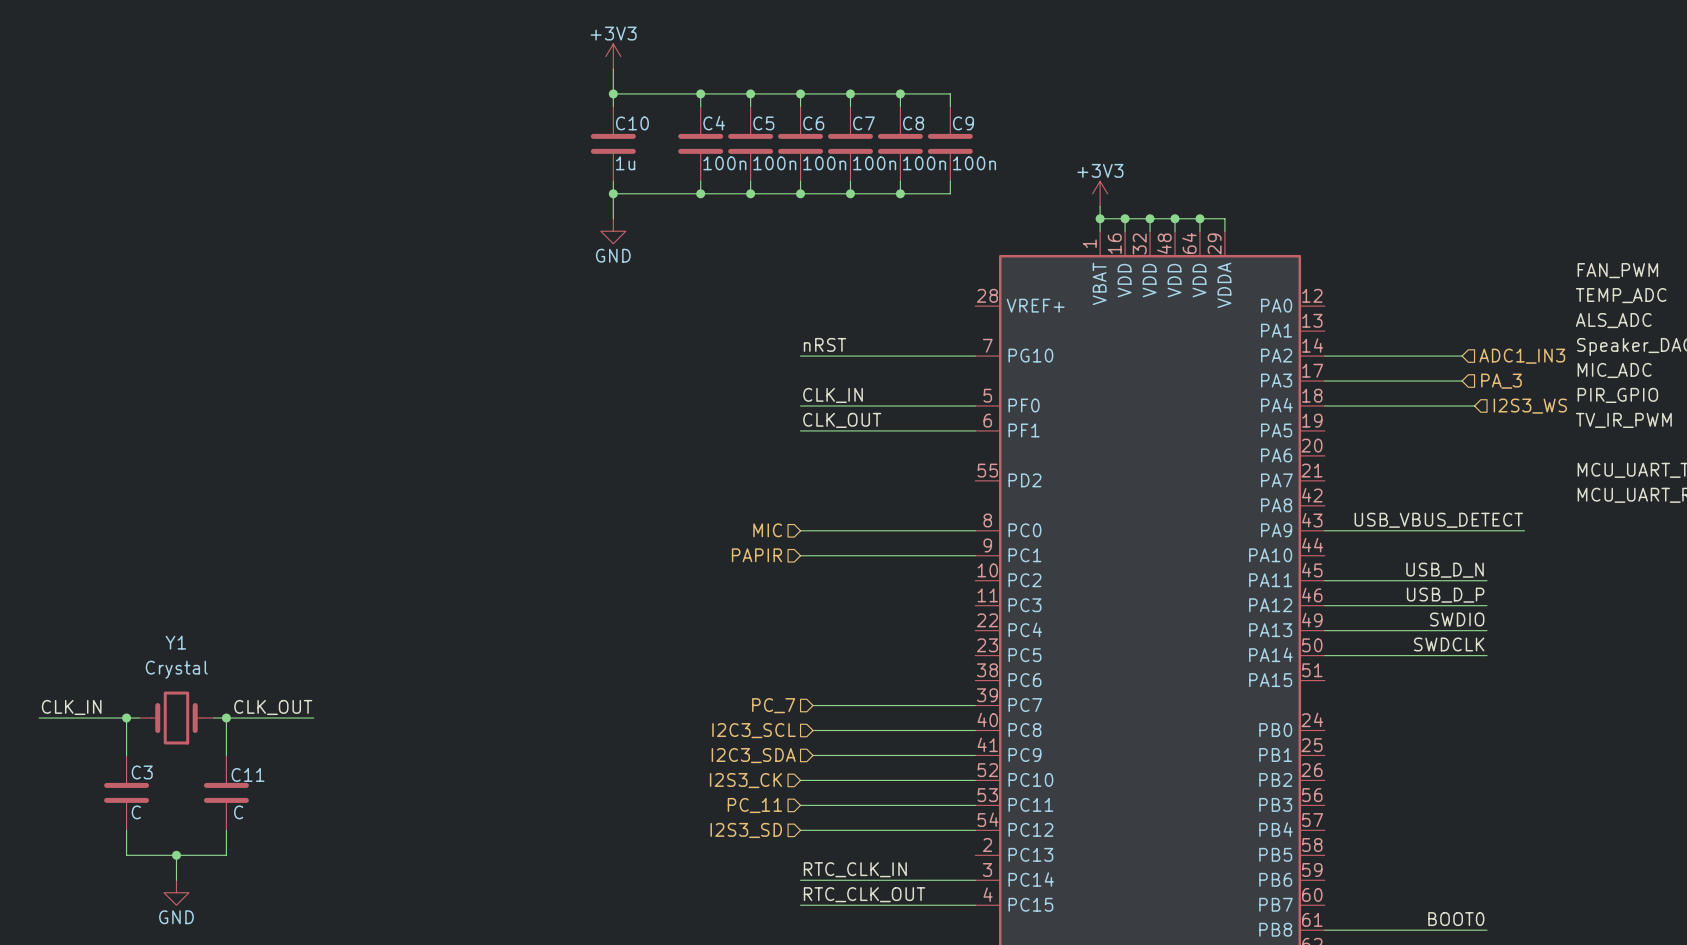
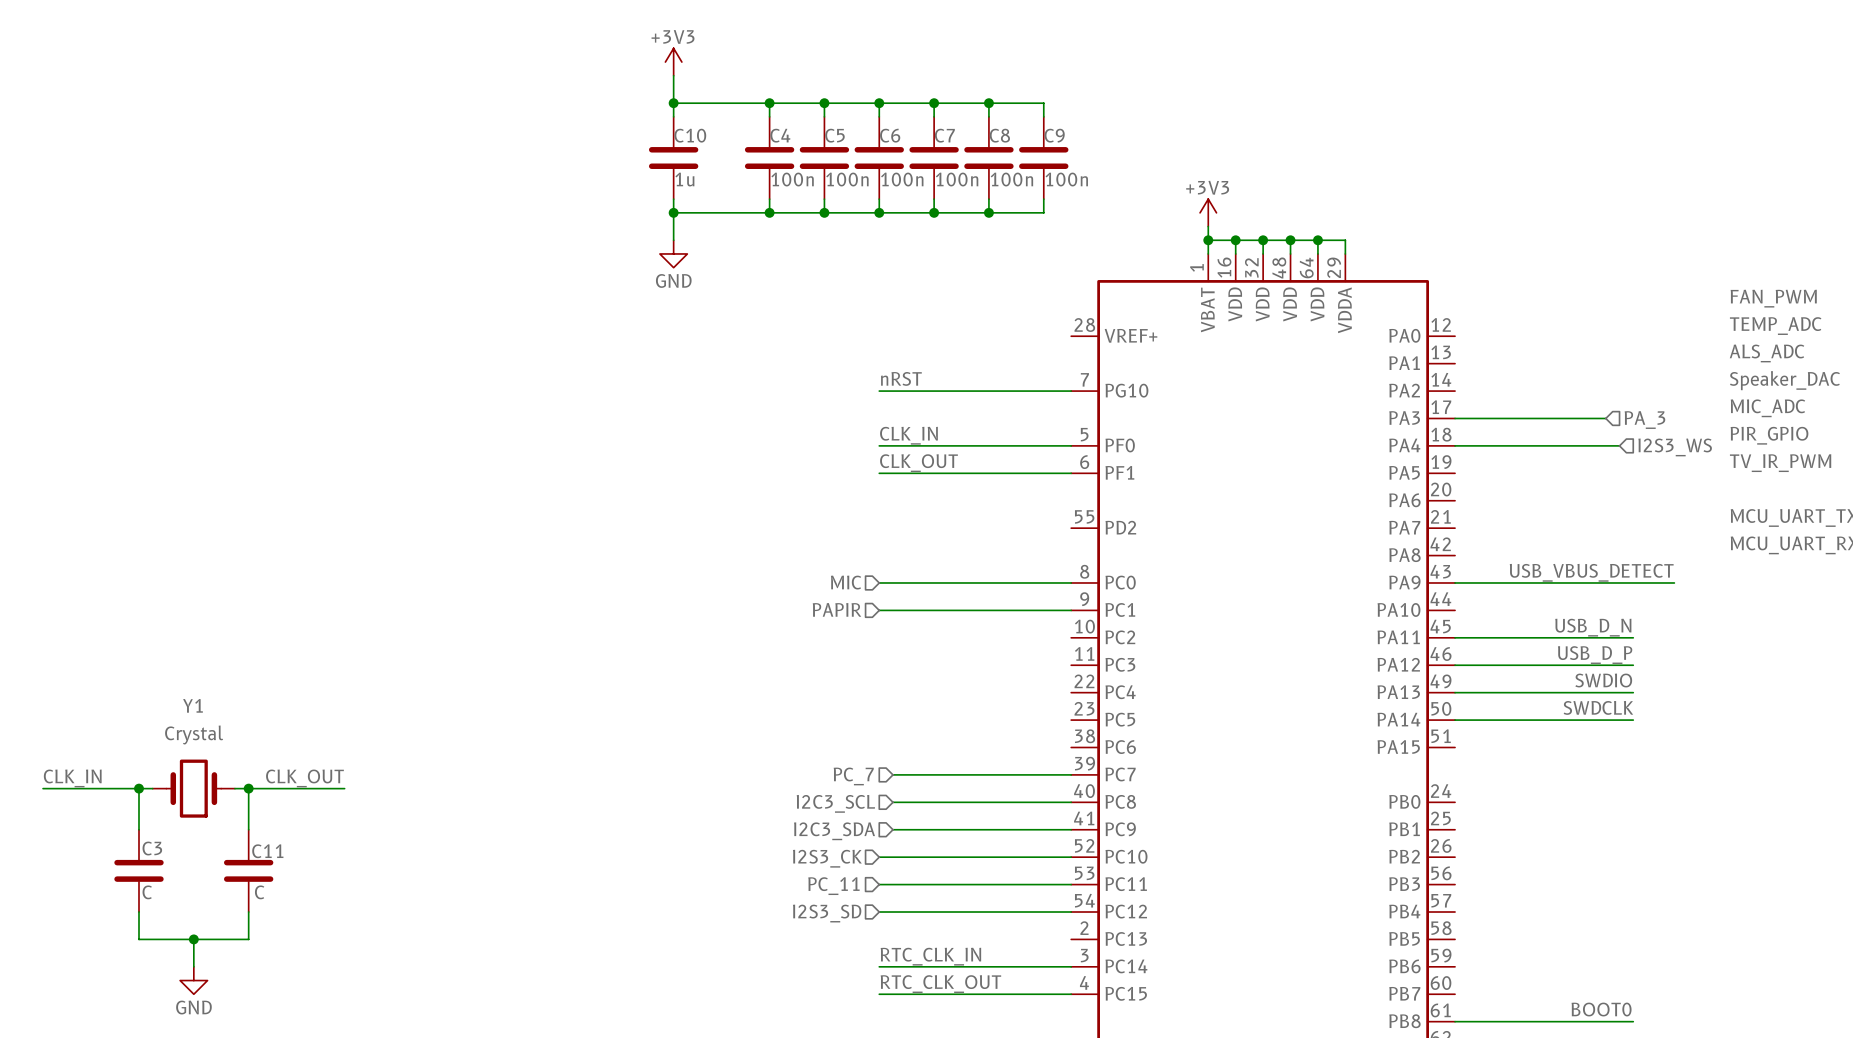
wire: (1324, 356) (1462, 356) -> none
hierarchical label: ADC1_IN3 (1522, 356) -> none

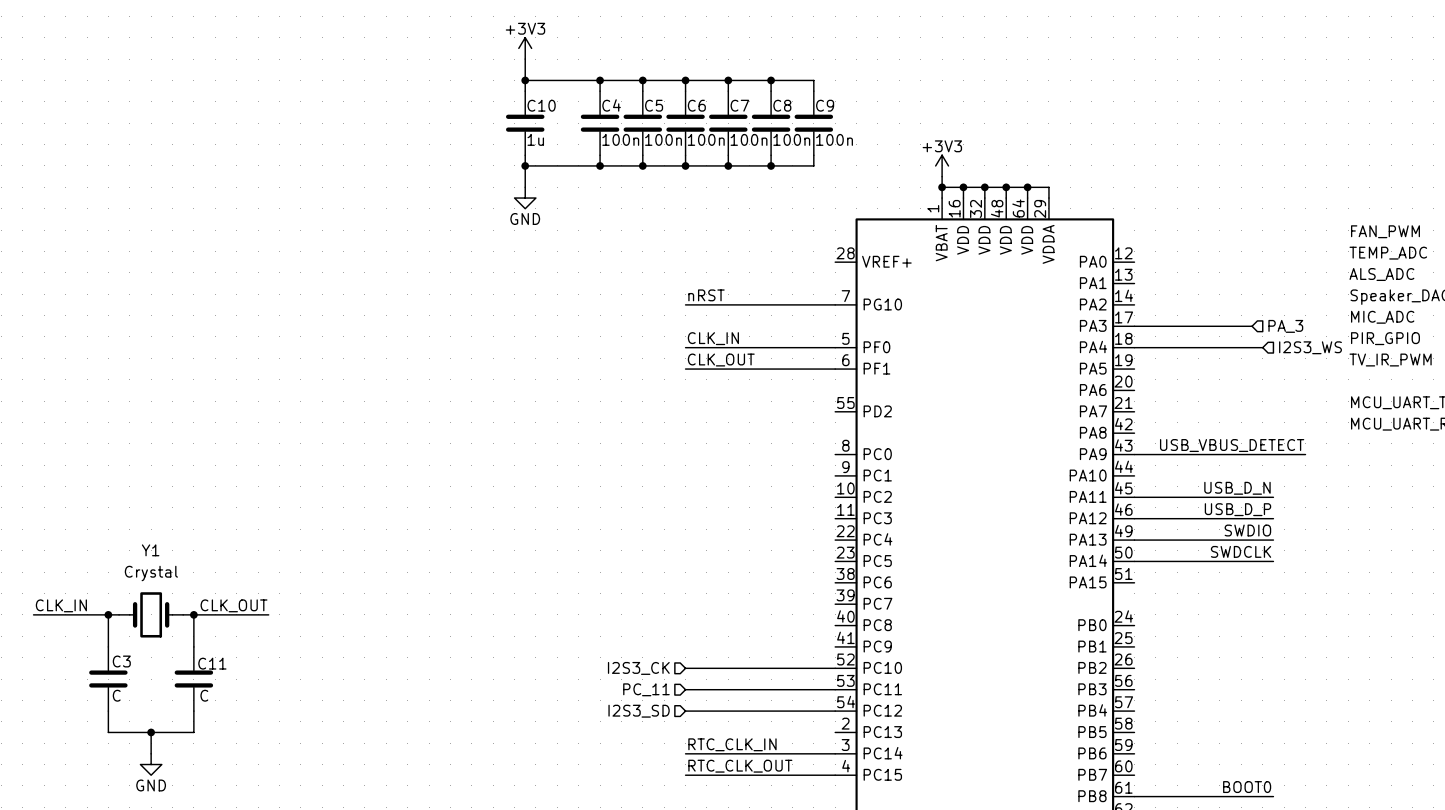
hierarchical label: MIC (846, 582) -> none
wire: (879, 582) (1071, 582) -> none
hierarchical label: PAPIR (837, 609) -> none
wire: (879, 610) (1071, 610) -> none
wire: (892, 774) (1071, 774) -> none
hierarchical label: PC_7 (853, 776) -> none
wire: (892, 802) (1071, 802) -> none
hierarchical label: I2C3_SCL (835, 803) -> none
wire: (892, 829) (1071, 829) -> none
hierarchical label: I2C3_SDA (834, 831) -> none

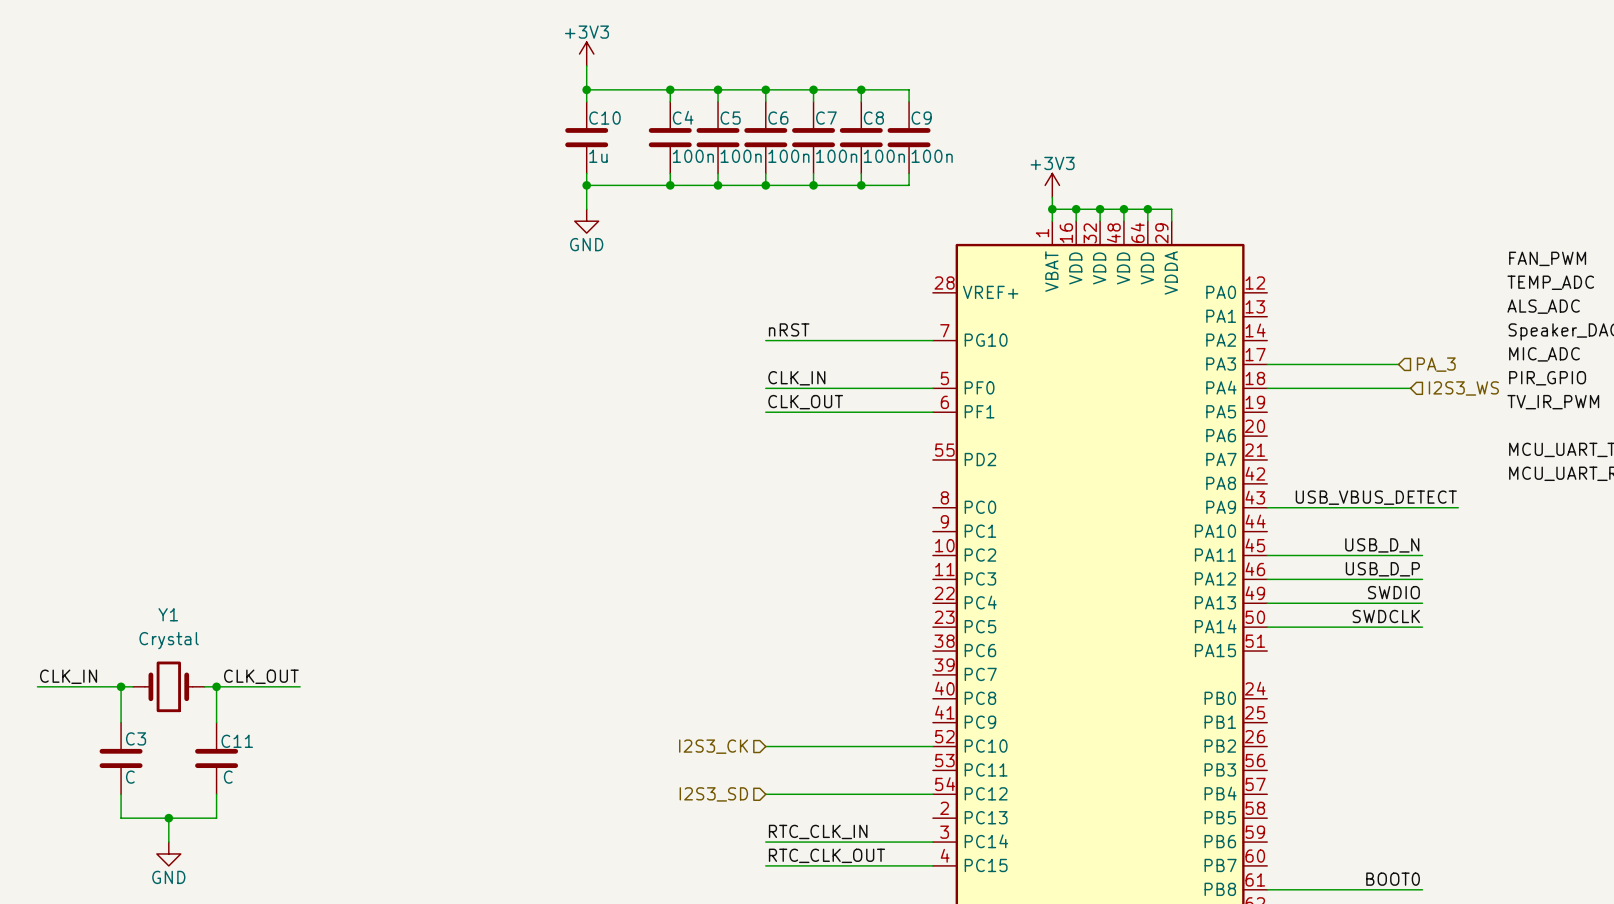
hierarchical label: PC_11 (646, 689) -> none
wire: (685, 689) (835, 689) -> none

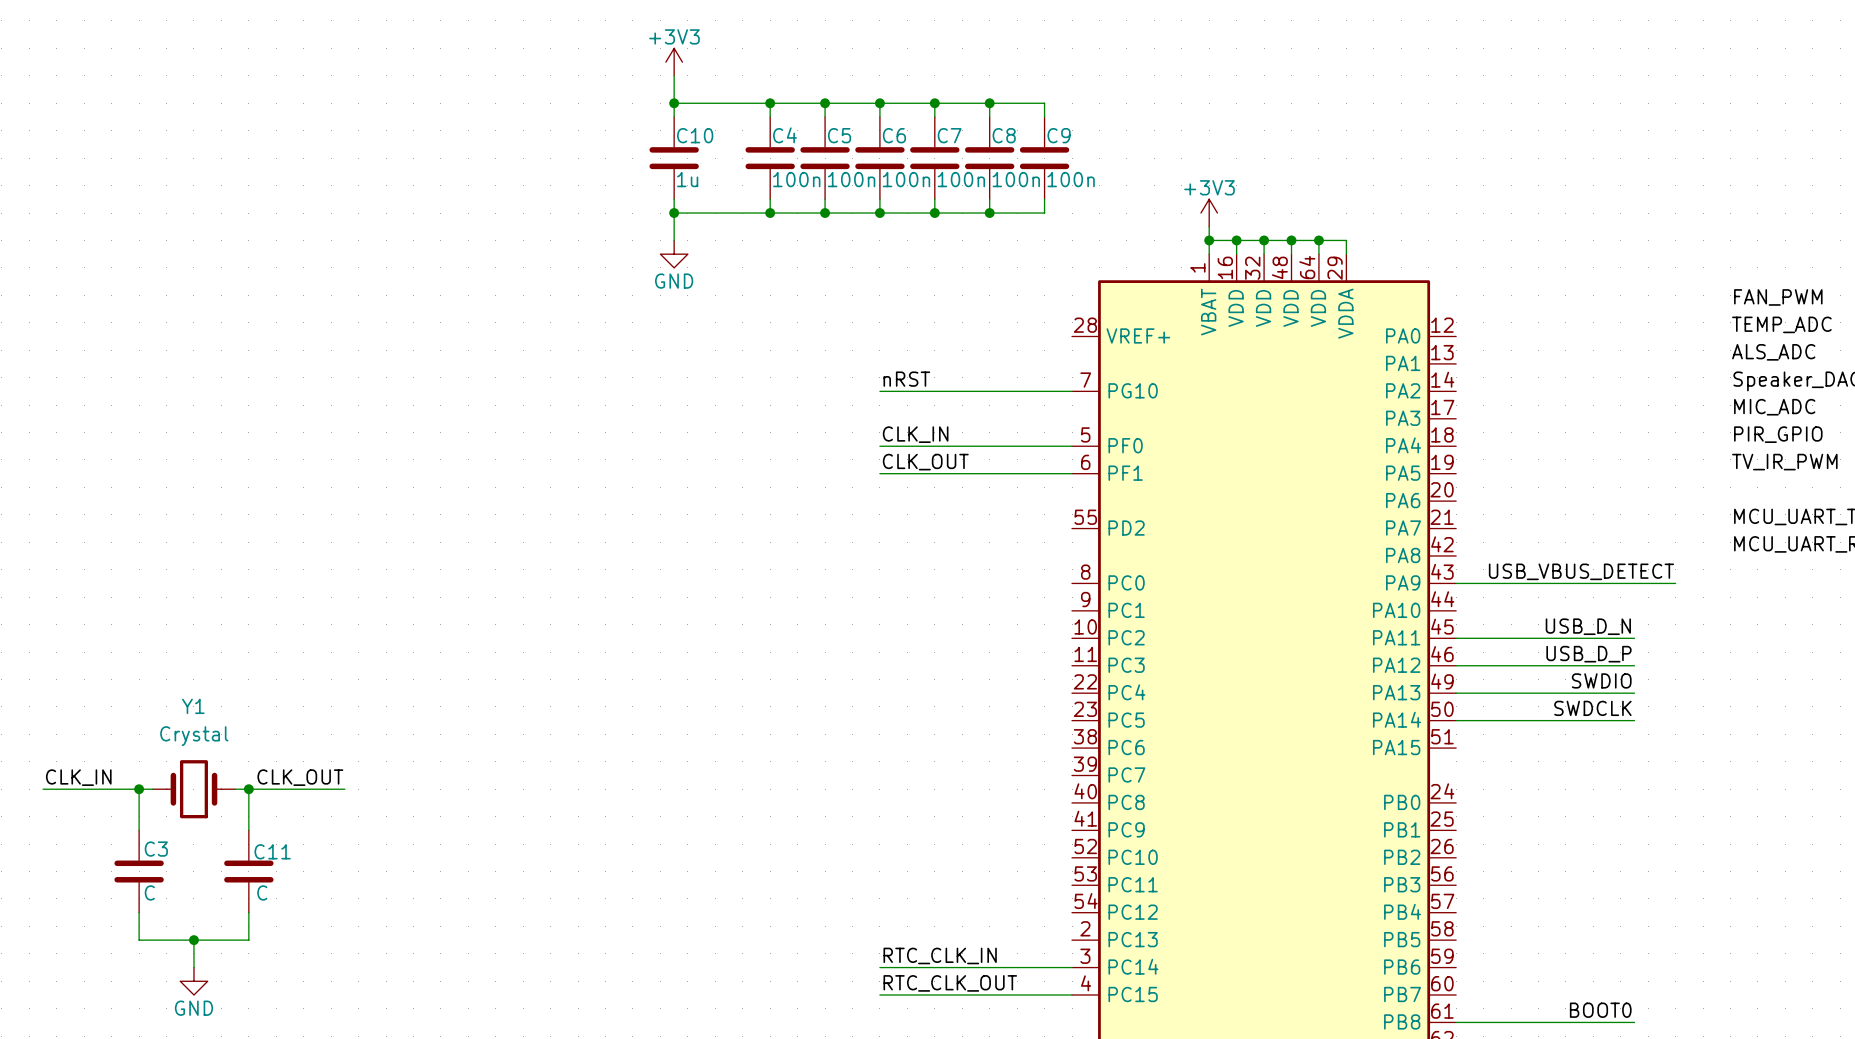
wire: (1267, 364) (1398, 364) -> none
hierarchical label: PA_3 (1436, 364) -> none
wire: (1267, 388) (1410, 388) -> none
hierarchical label: I2S3_WS (1463, 388) -> none
hierarchical label: I2S3_CK (713, 746) -> none
wire: (765, 746) (932, 746) -> none
hierarchical label: I2S3_SD (713, 794) -> none
wire: (765, 794) (932, 794) -> none

